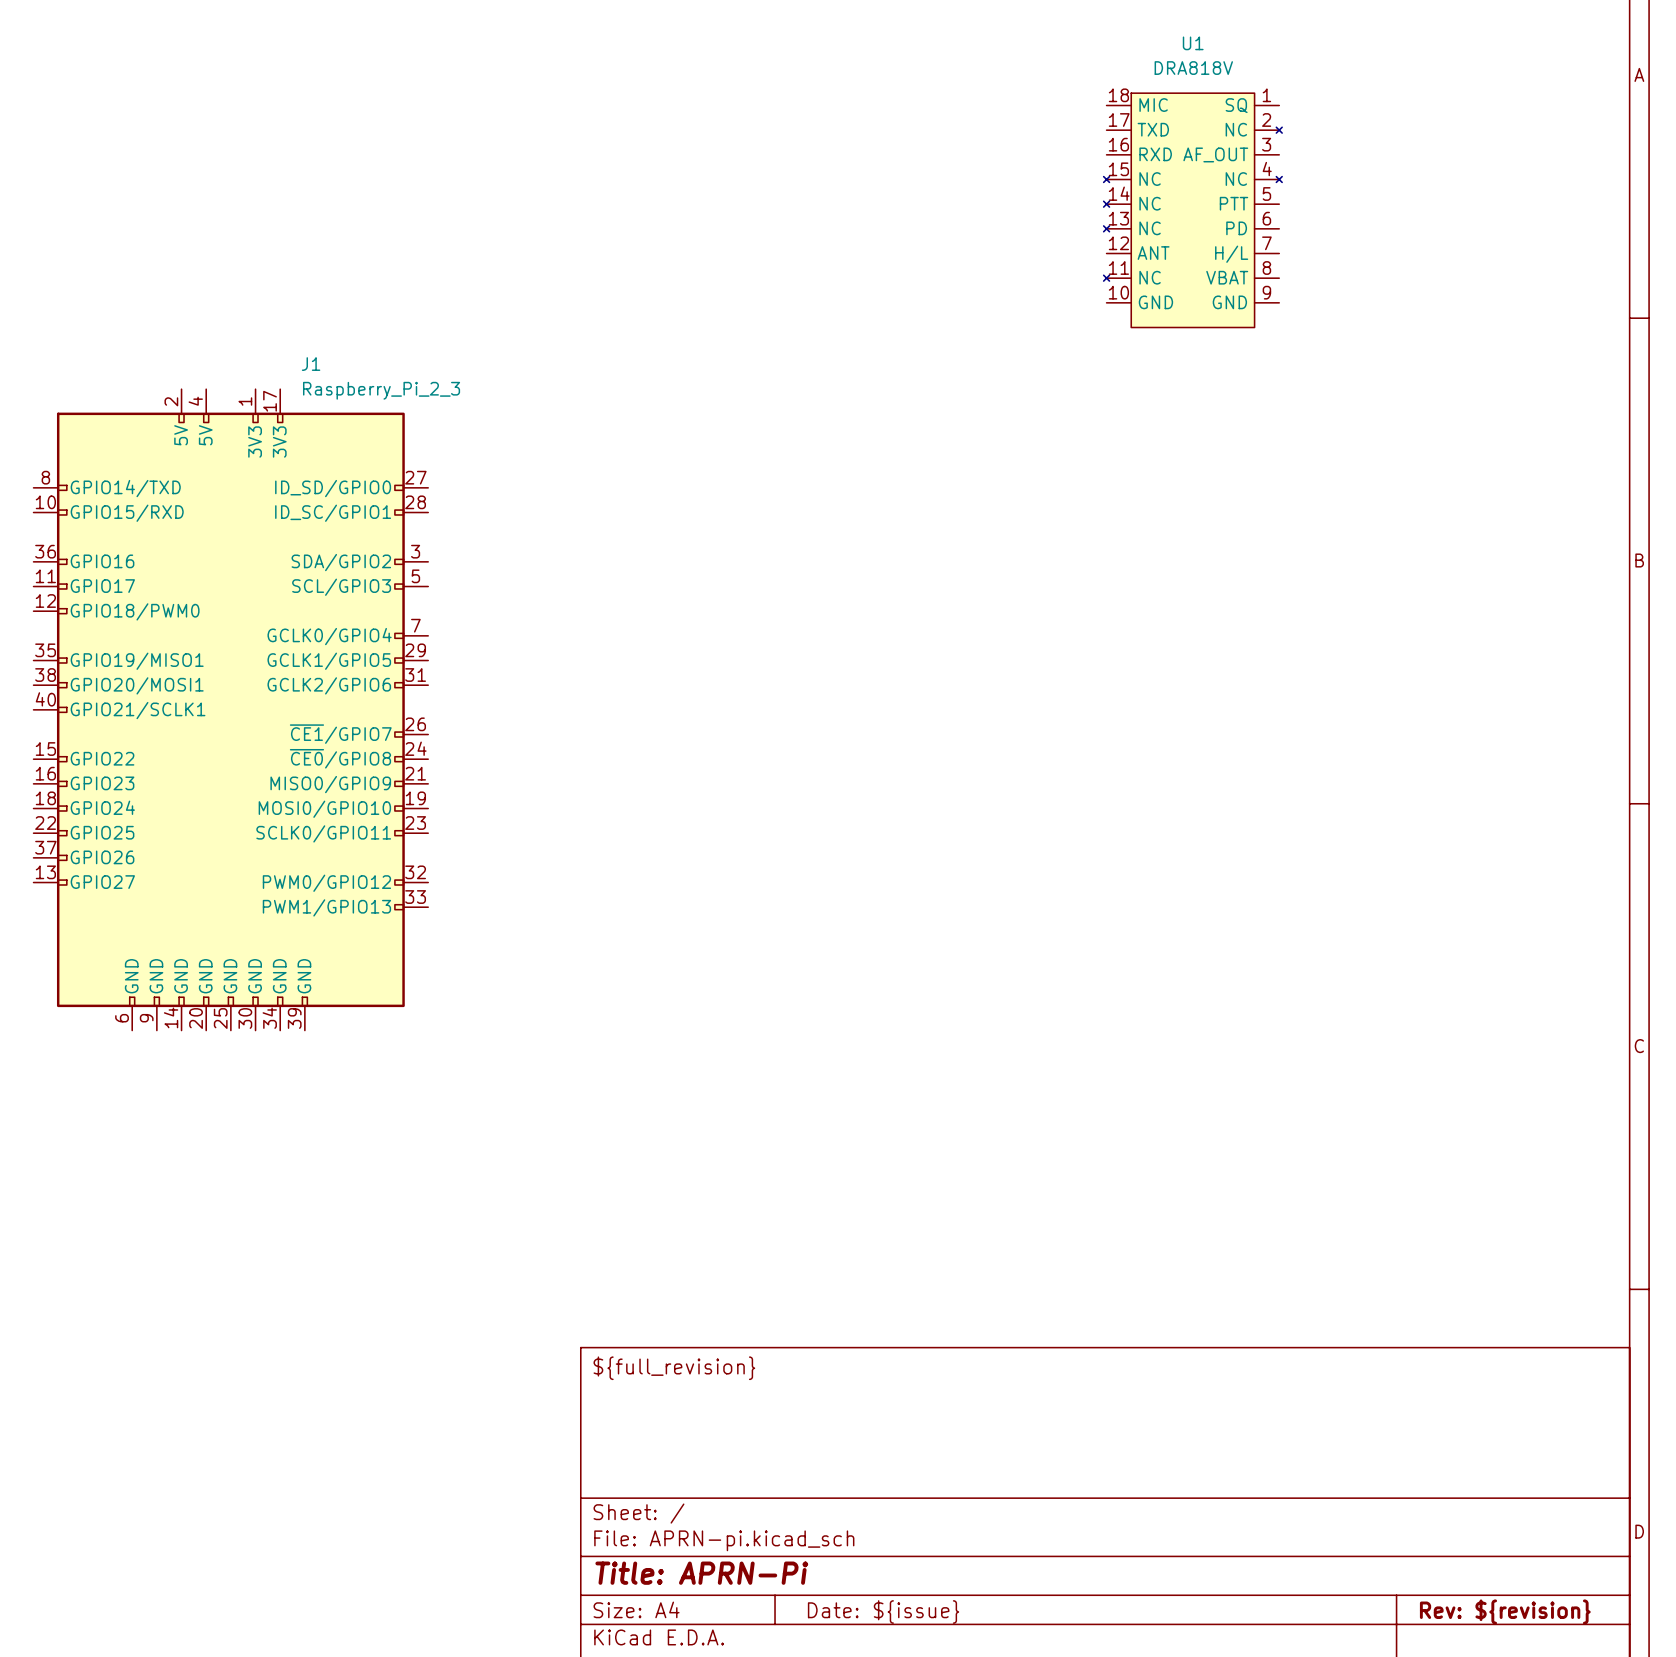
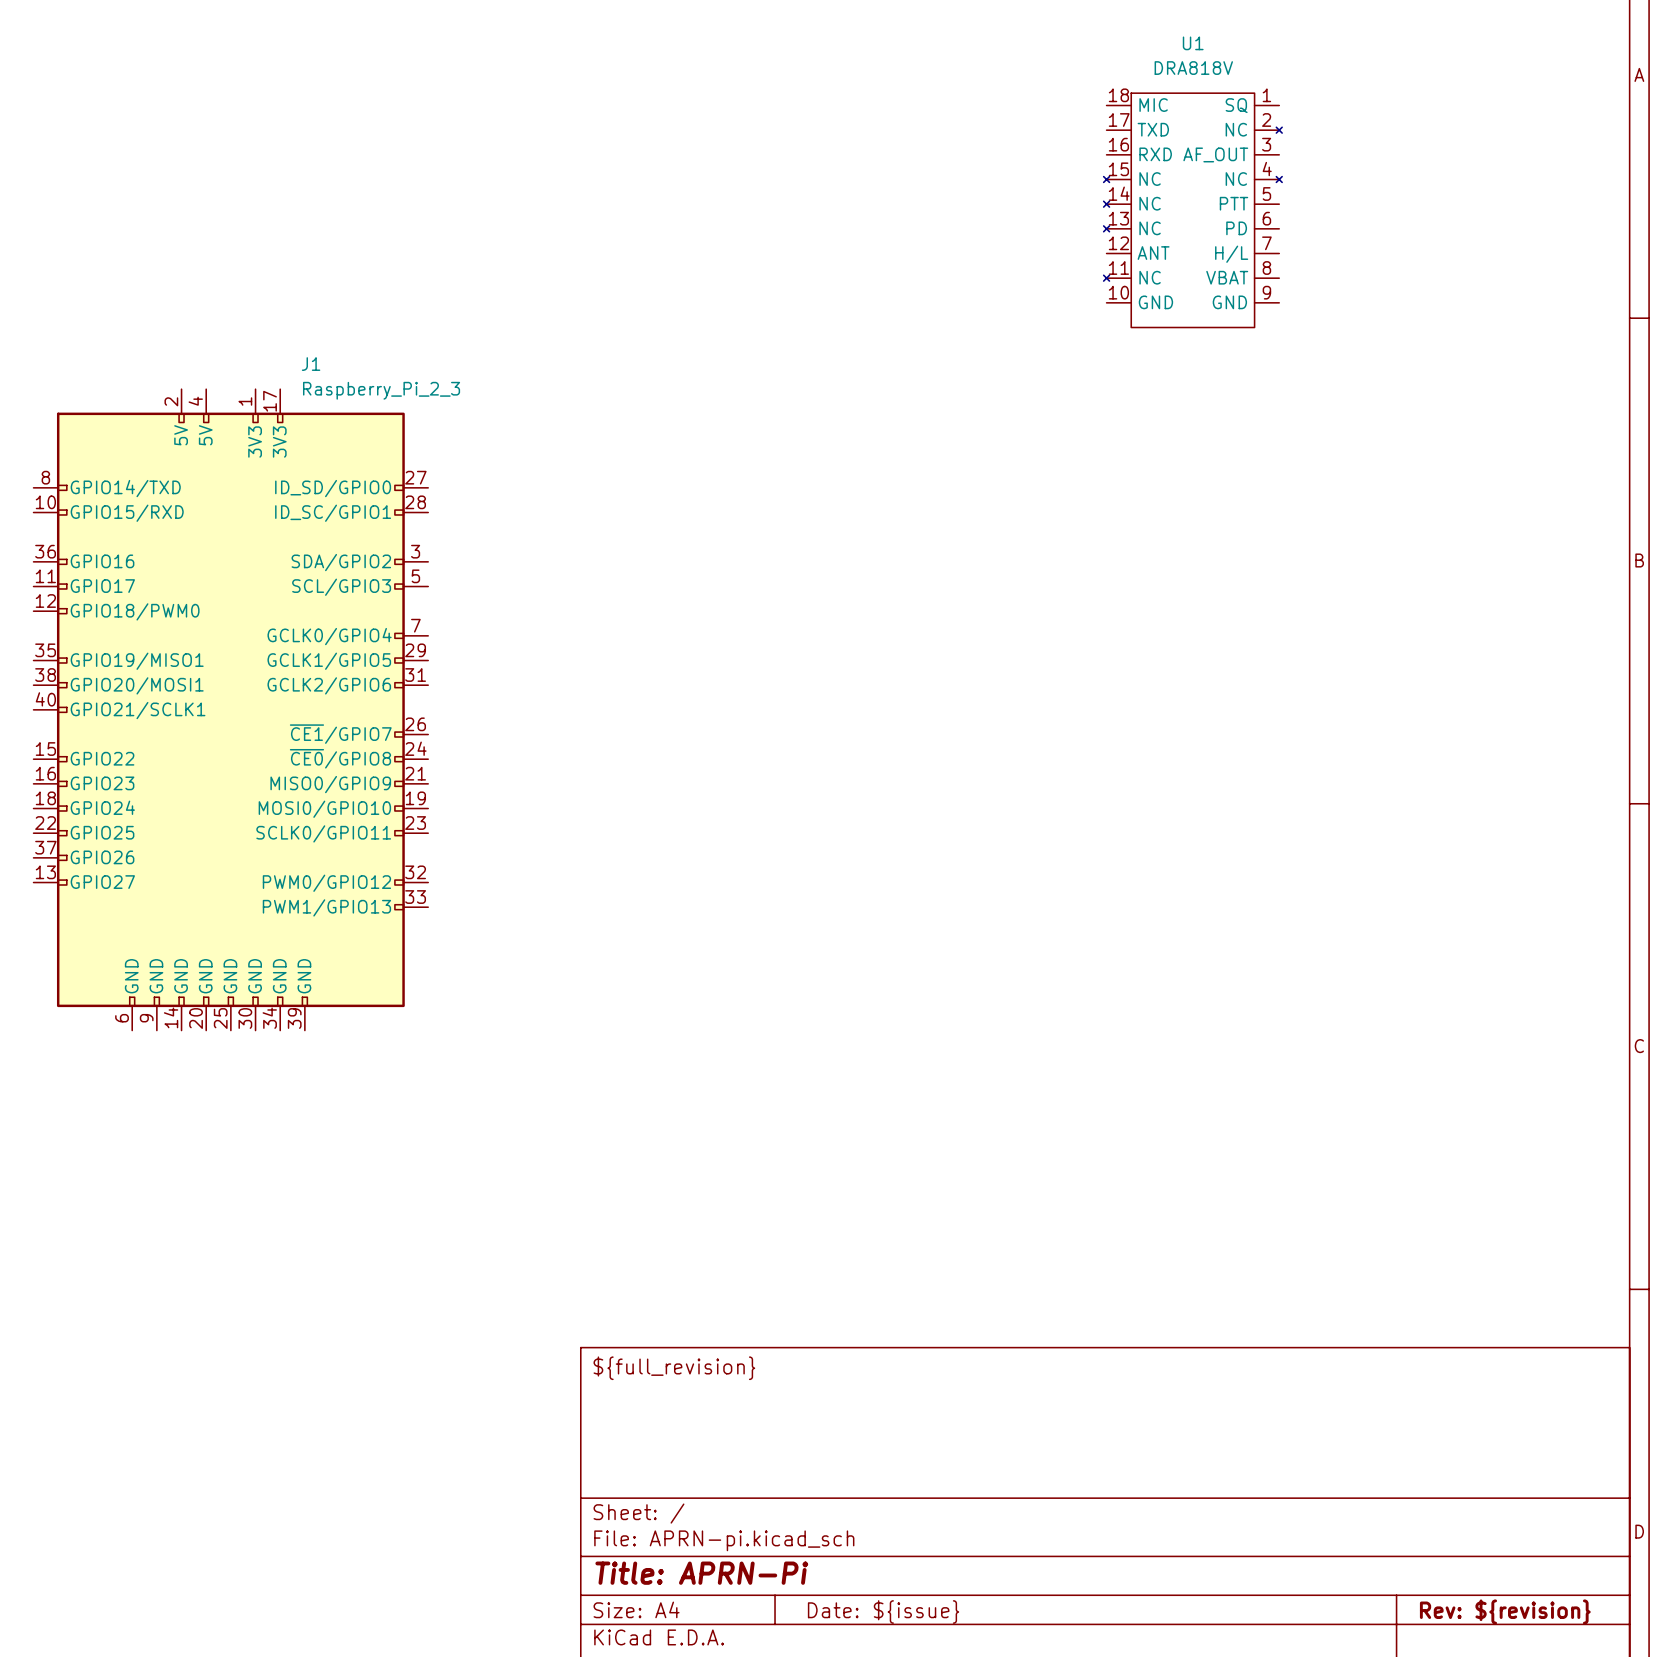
U1 symbol: [1103, 93, 1283, 328] -> [1103, 93, 1283, 328]

